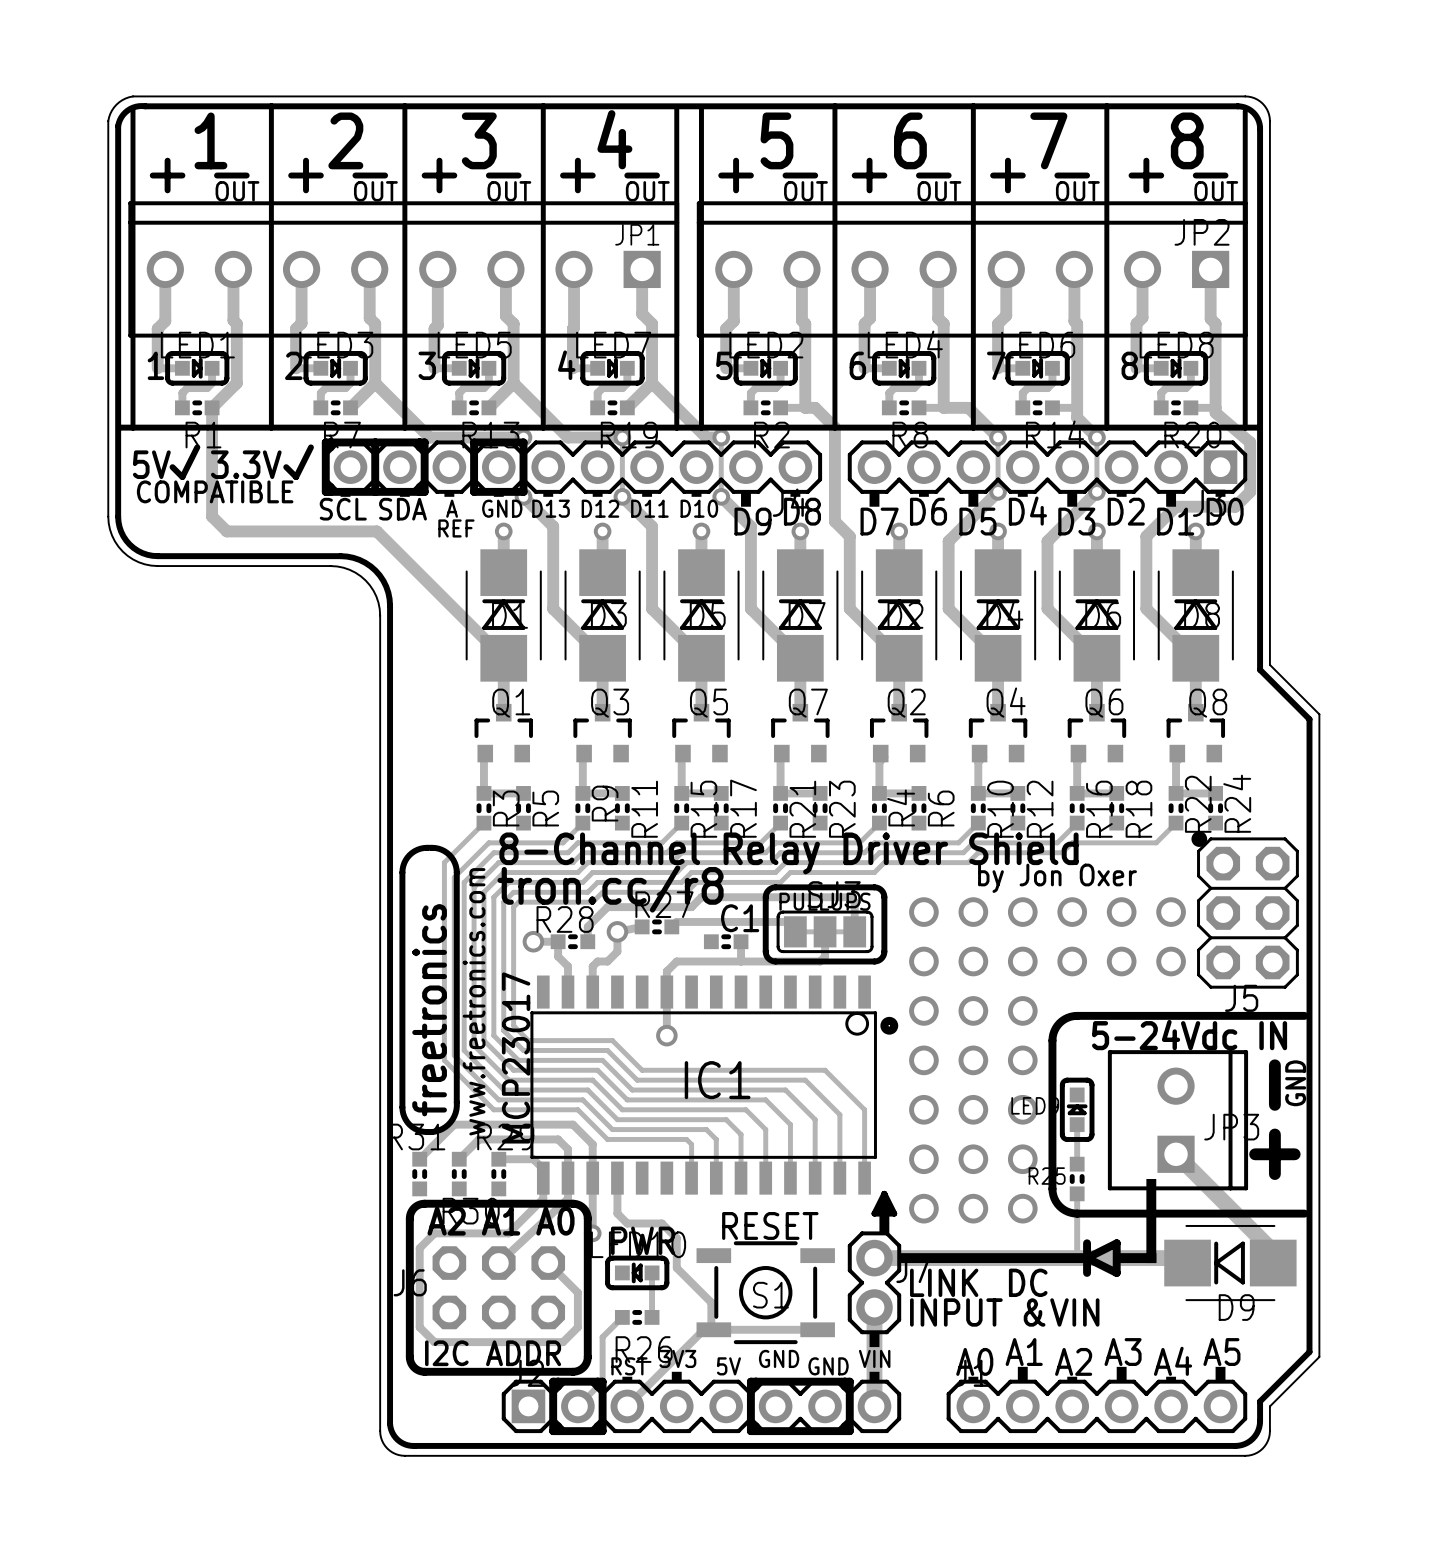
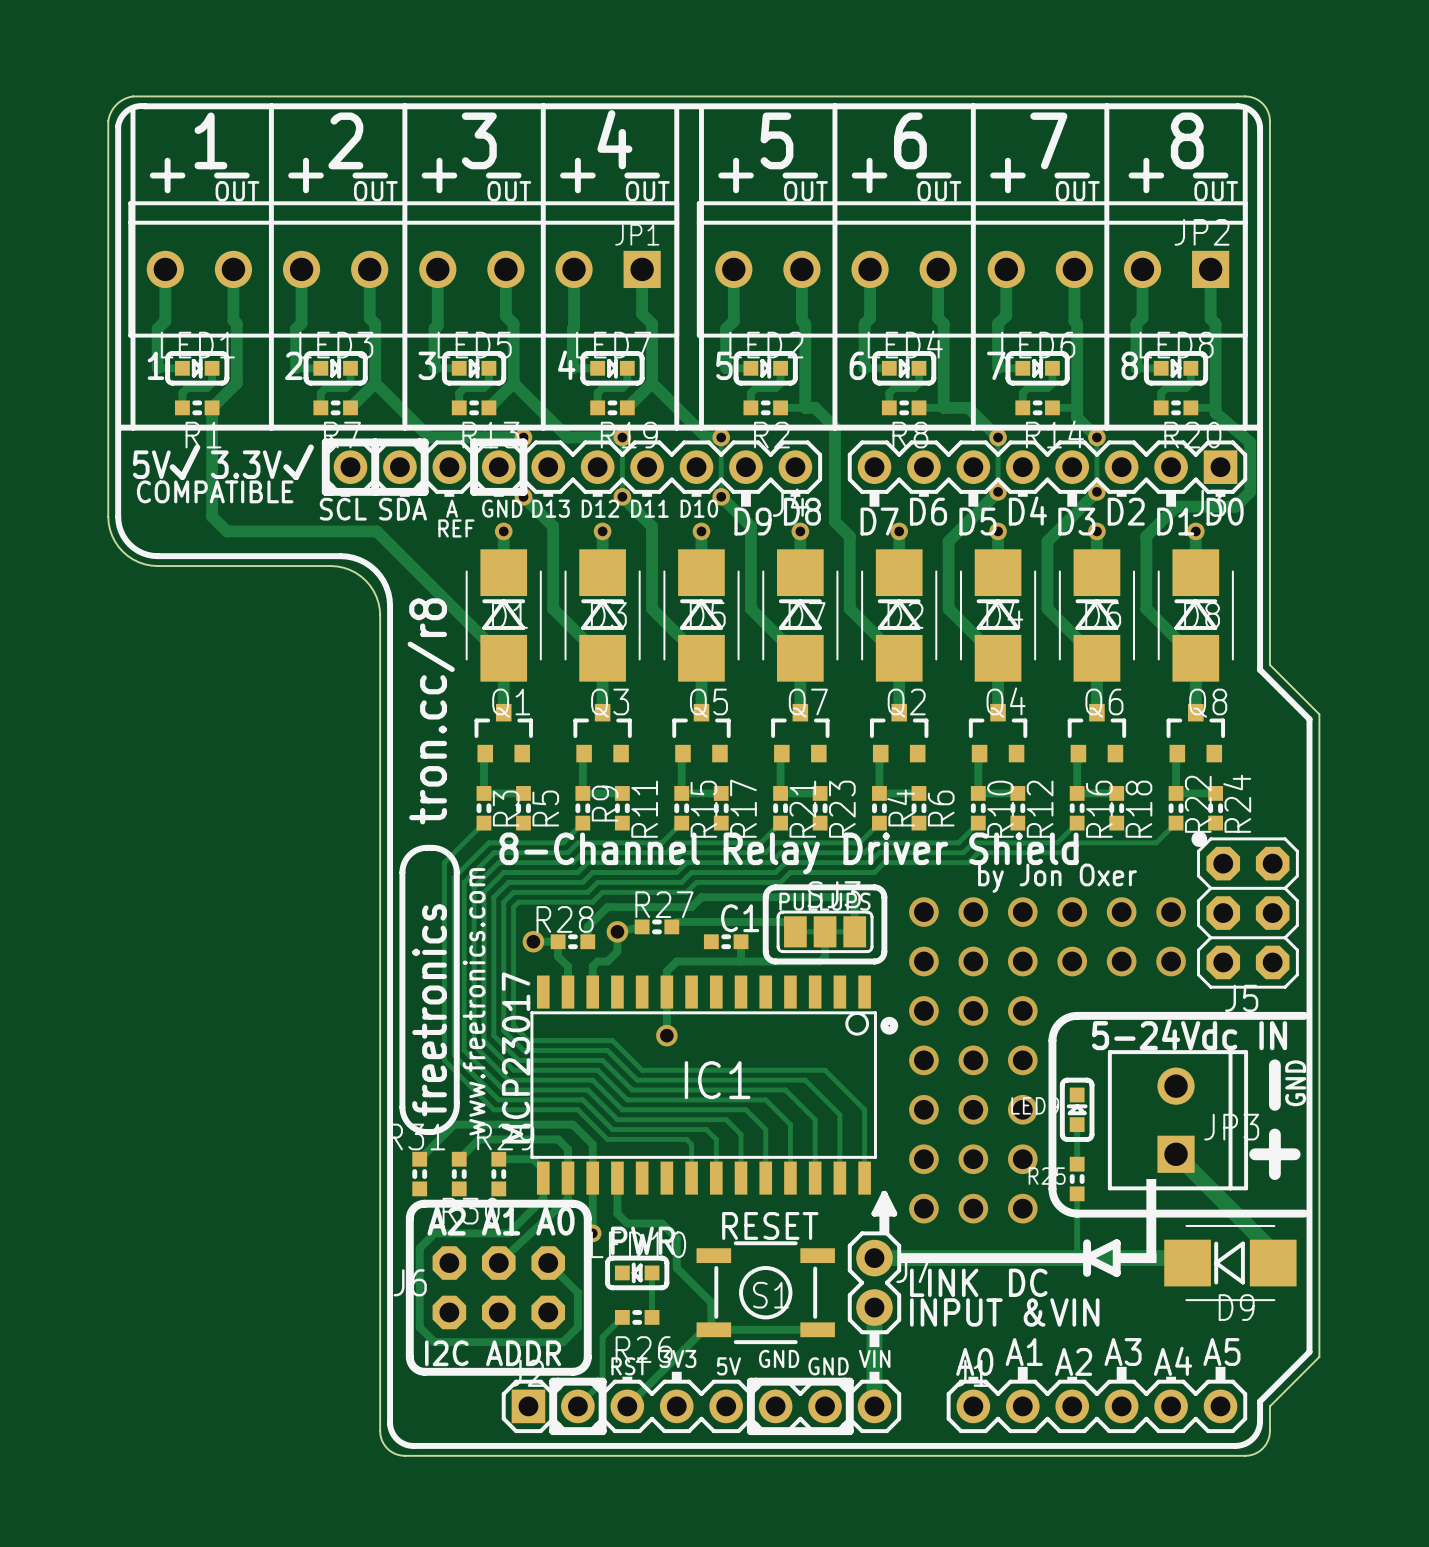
text rotation: 0° (610, 888) -> 90° counterclockwise (431, 711)
text position: tron.cc/r8 (610, 888) -> tron.cc/r8 (431, 711)

